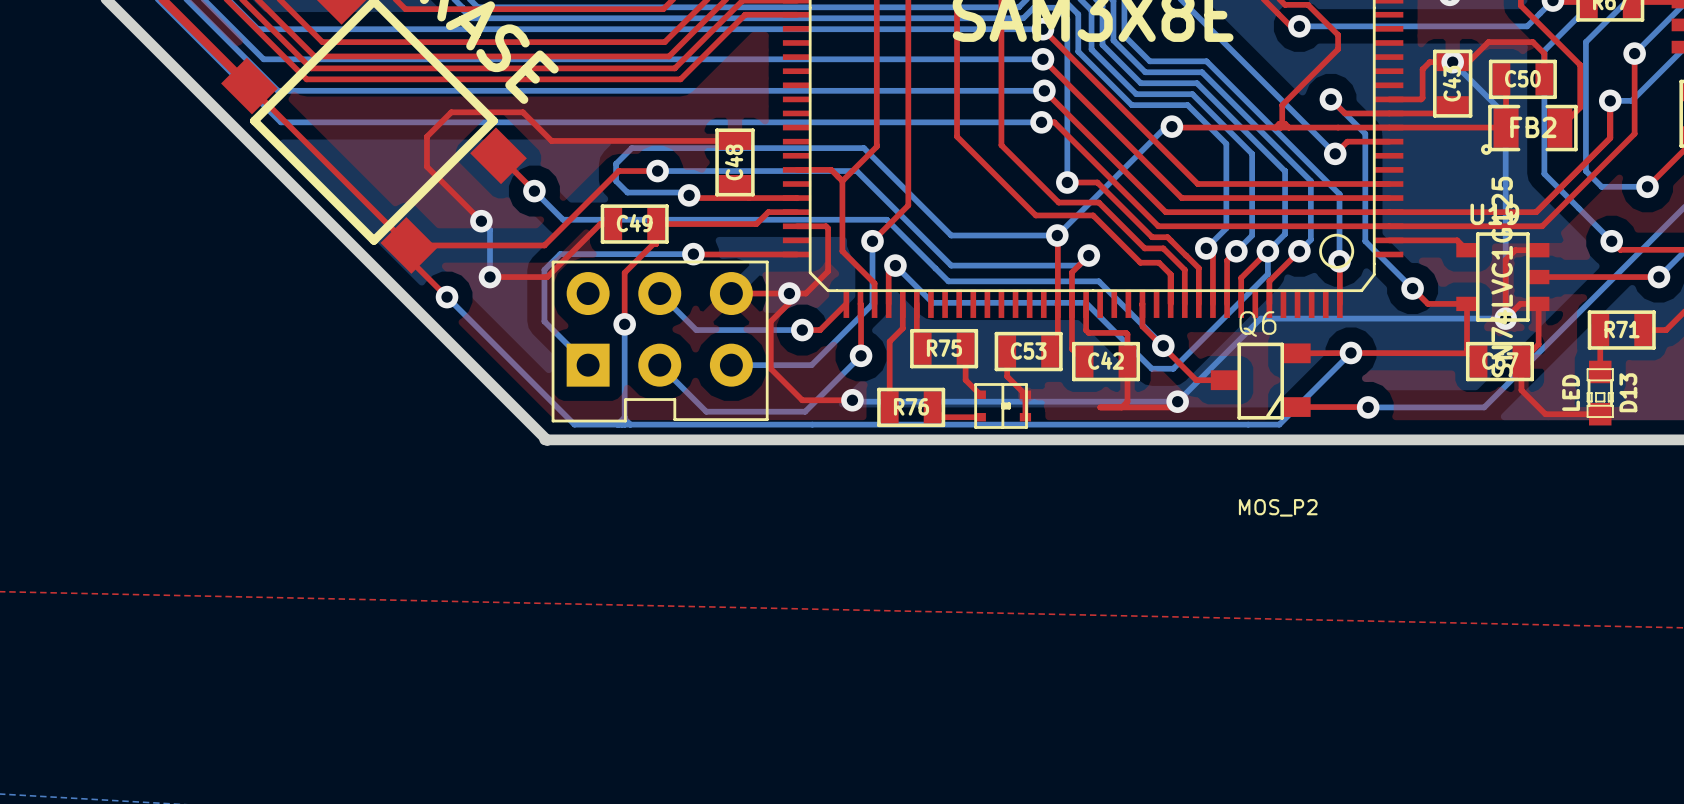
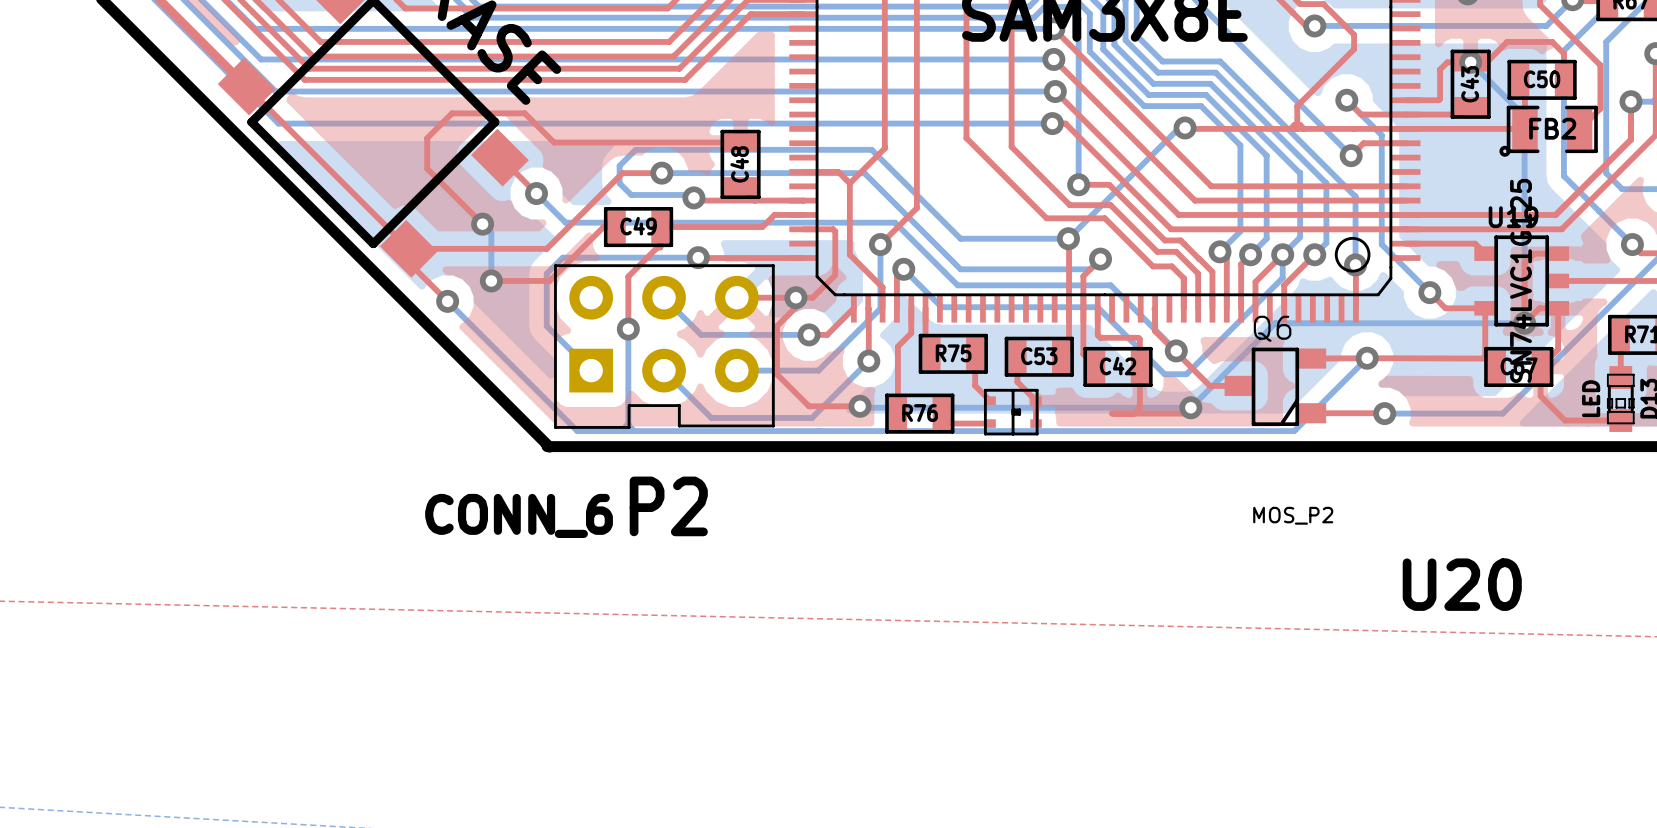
P2 name: none -> P2 (668, 506)
P2 value: none -> CONN_6 (519, 515)
U20 name: none -> U20 (1462, 584)

